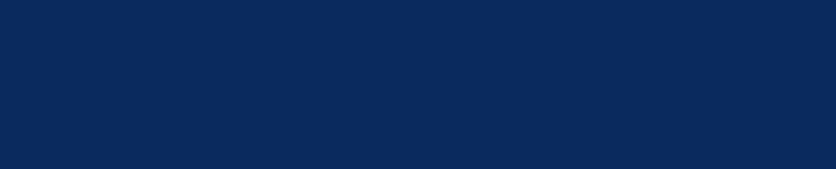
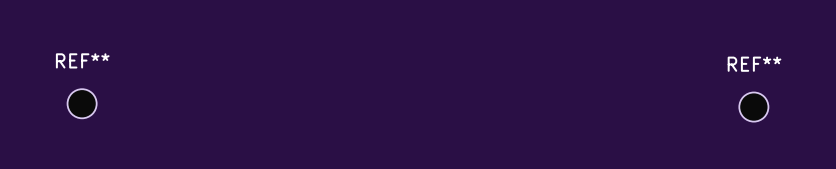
REF**: none -> (82, 103)
REF**: none -> (753, 107)

